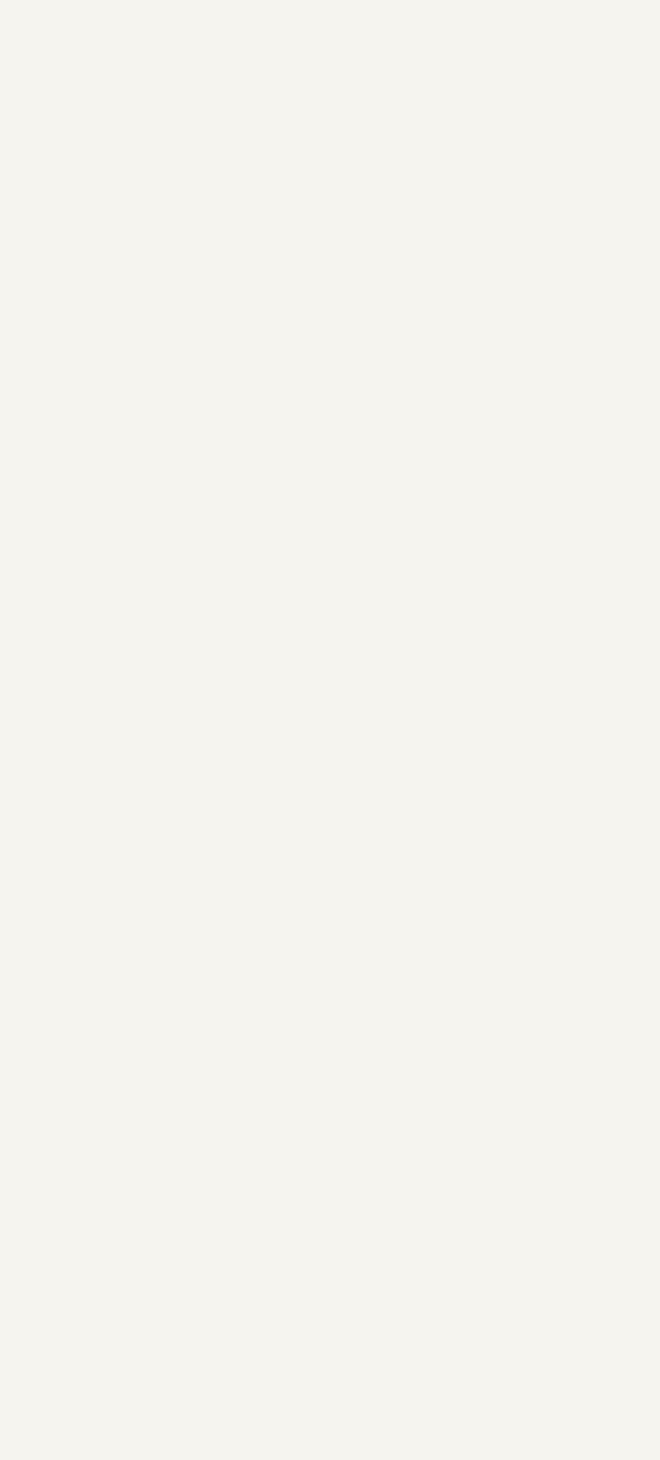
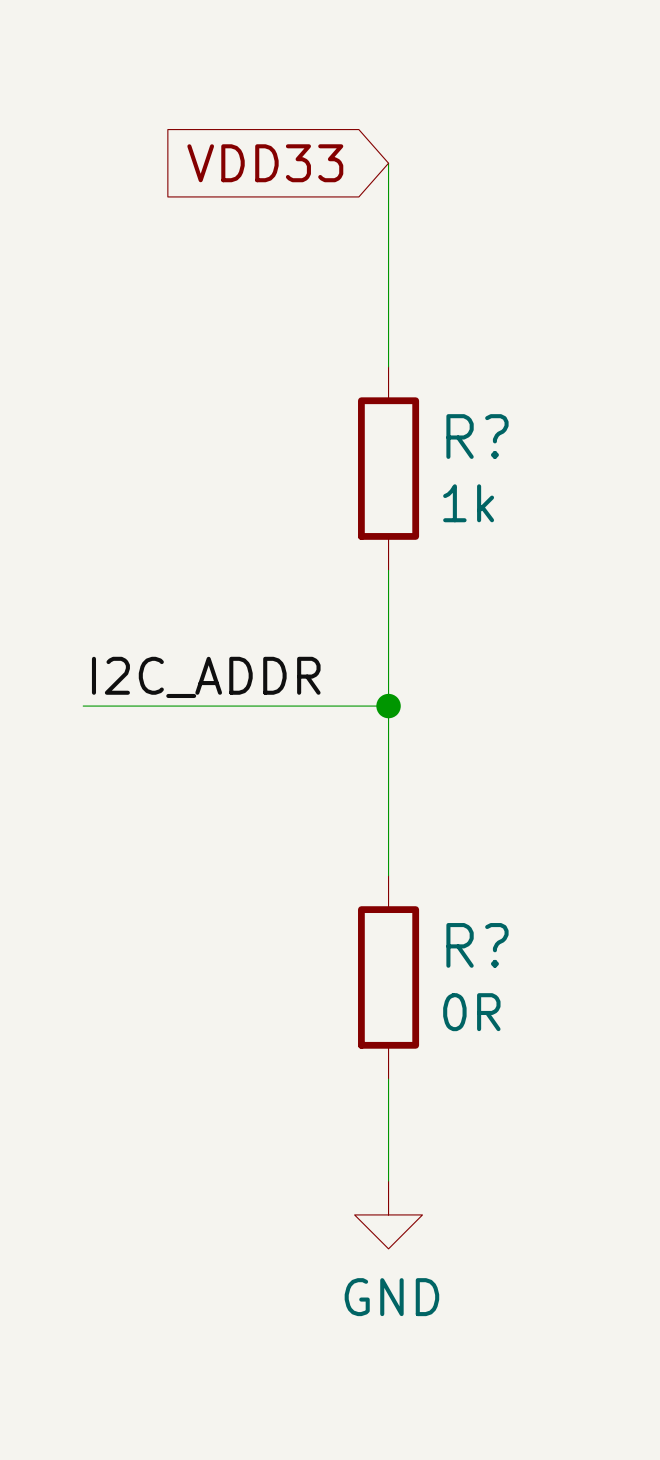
global label: none -> VDD33 (265, 163)
wire: none -> (388, 163) (388, 366)
R?: none -> (388, 468)
wire: none -> (388, 570) (388, 875)
label: none -> I2C_ADDR (206, 677)
wire: none -> (83, 706) (388, 706)
junction: none -> (388, 706)
R?: none -> (388, 977)
wire: none -> (388, 1079) (388, 1181)
power symbol: none -> GND (388, 1214)

